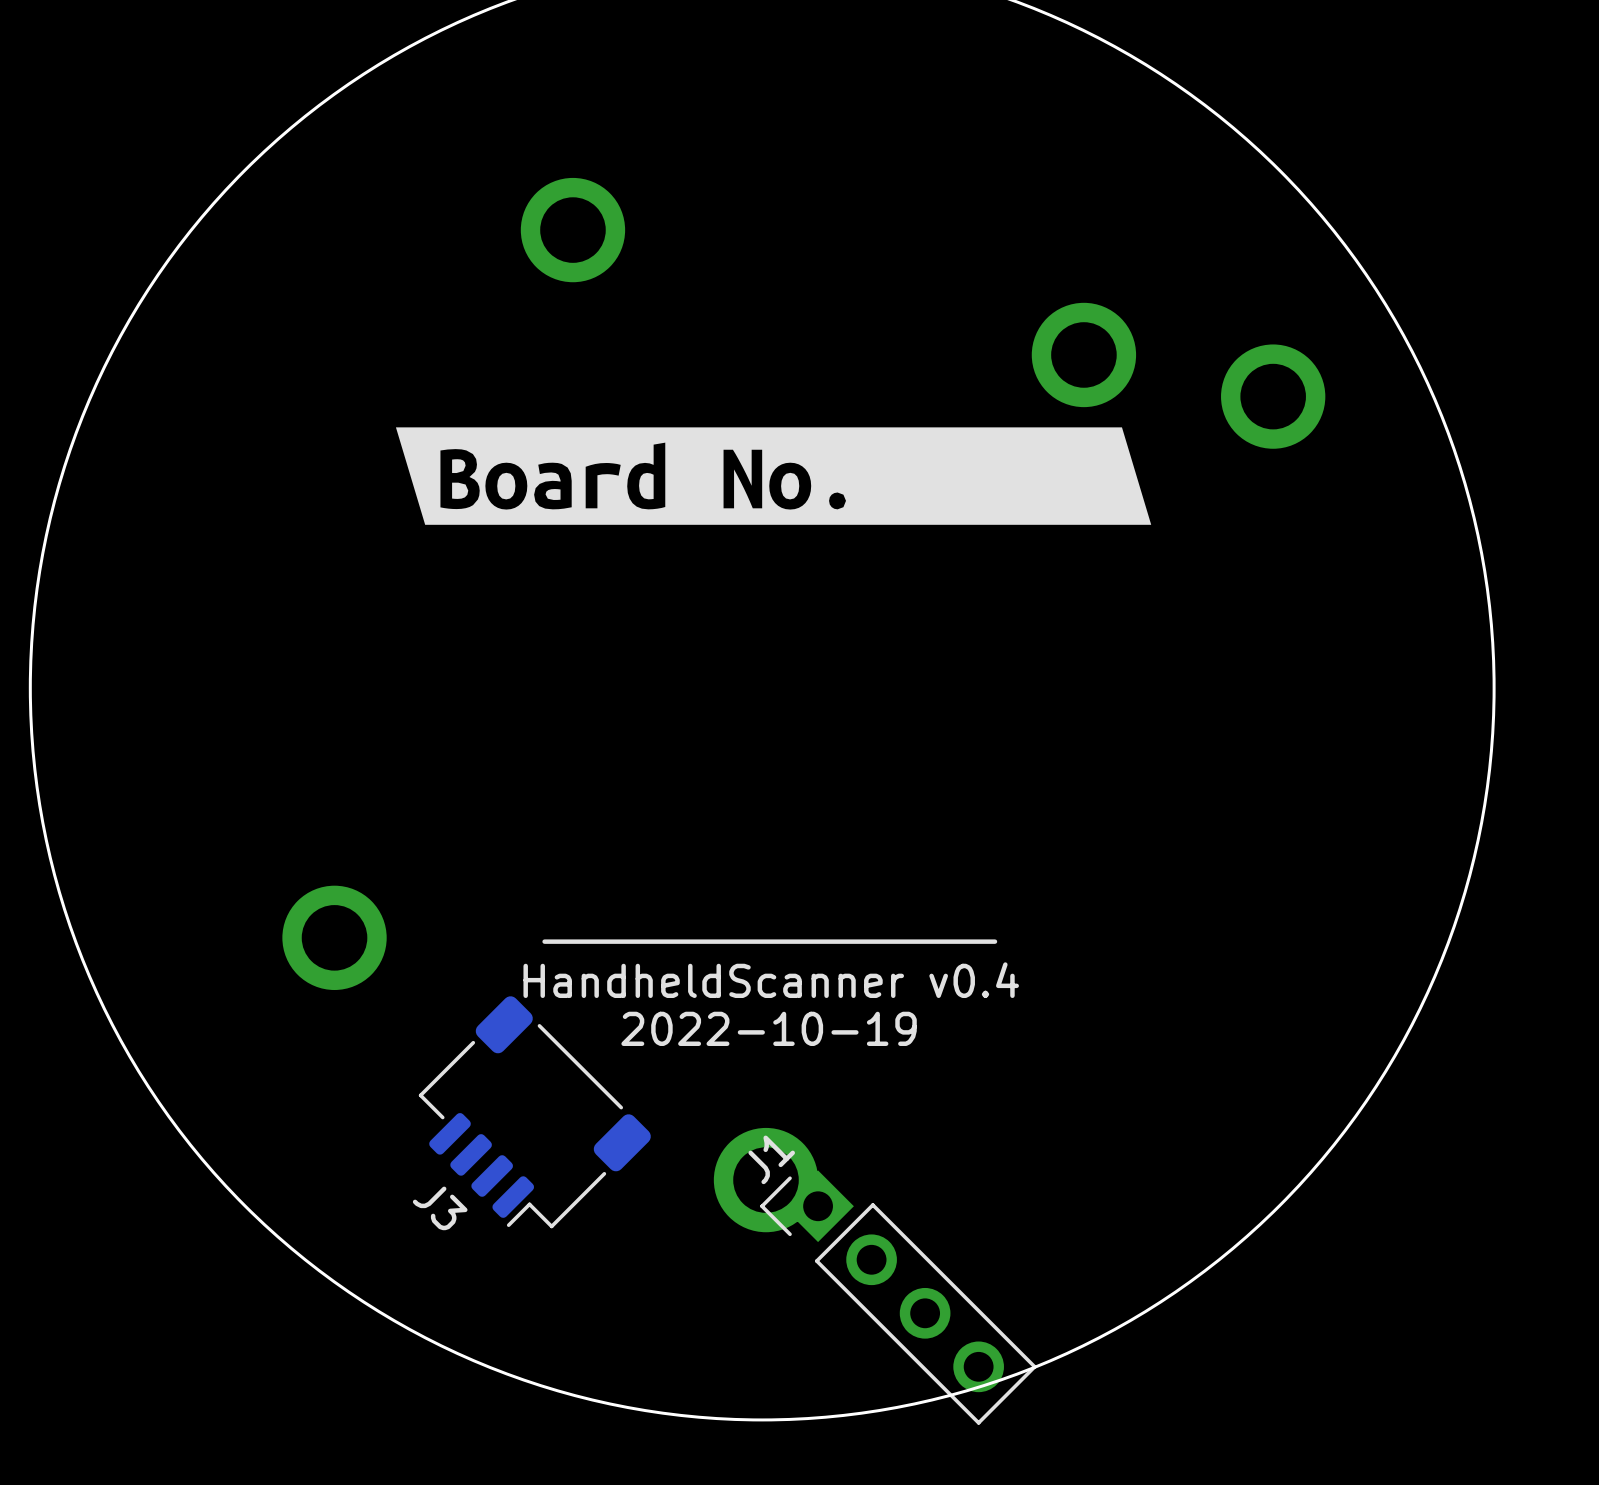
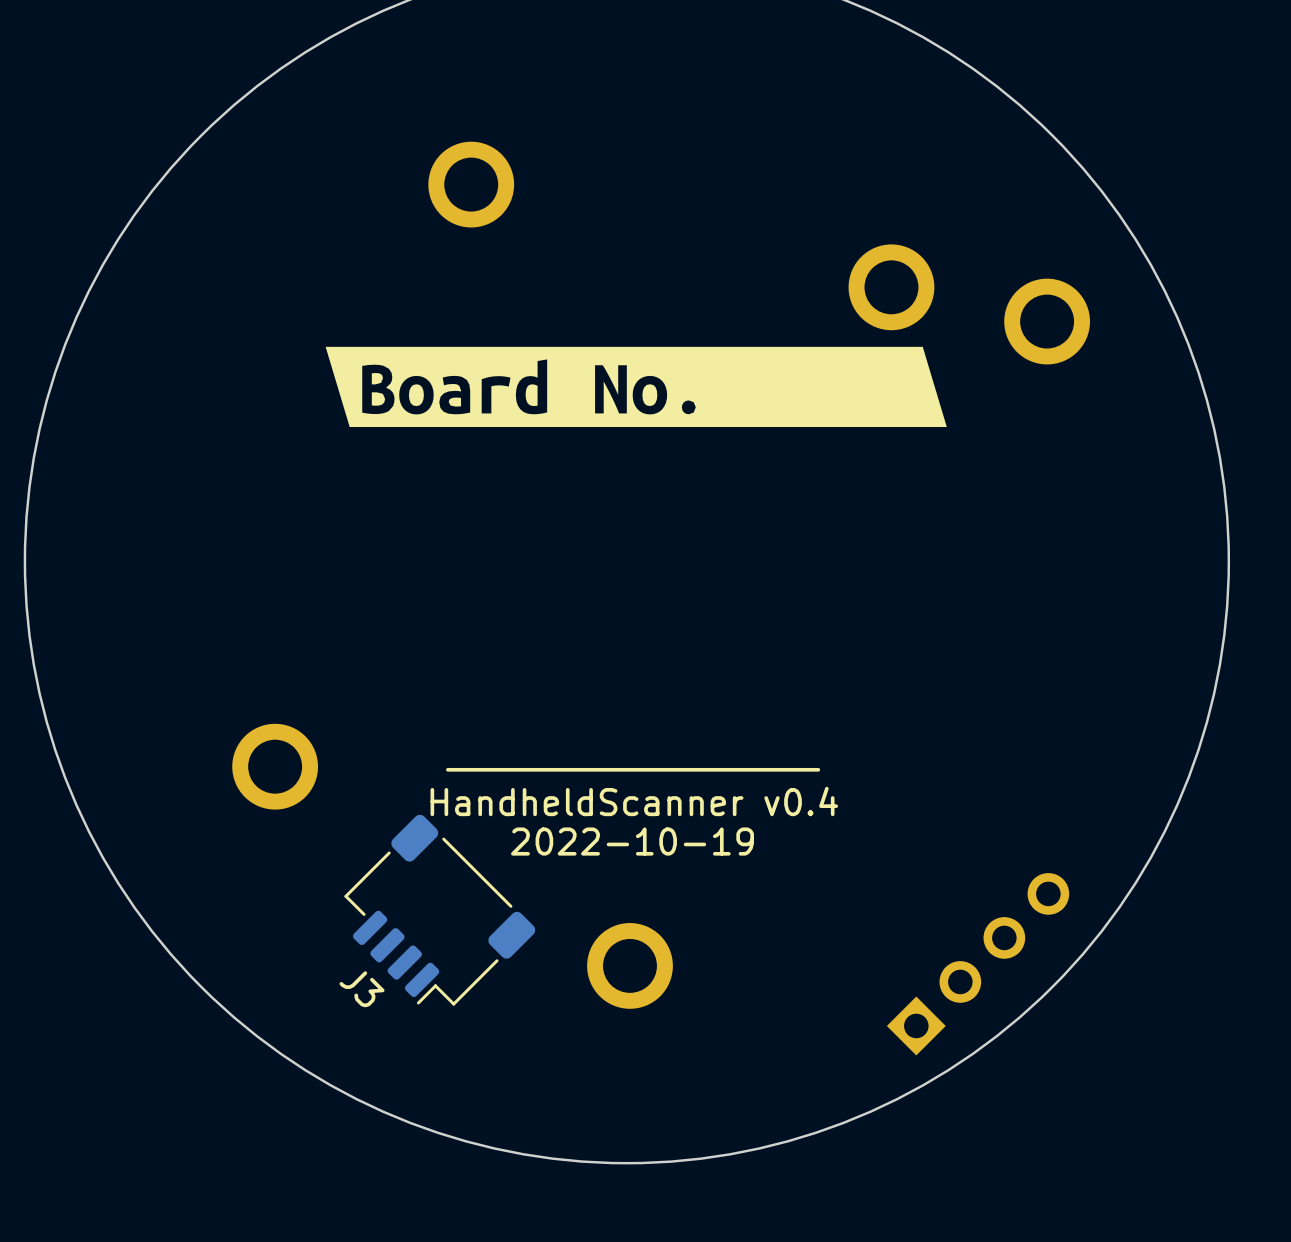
J1 side: bottom (898, 1297) -> top (978, 964)

